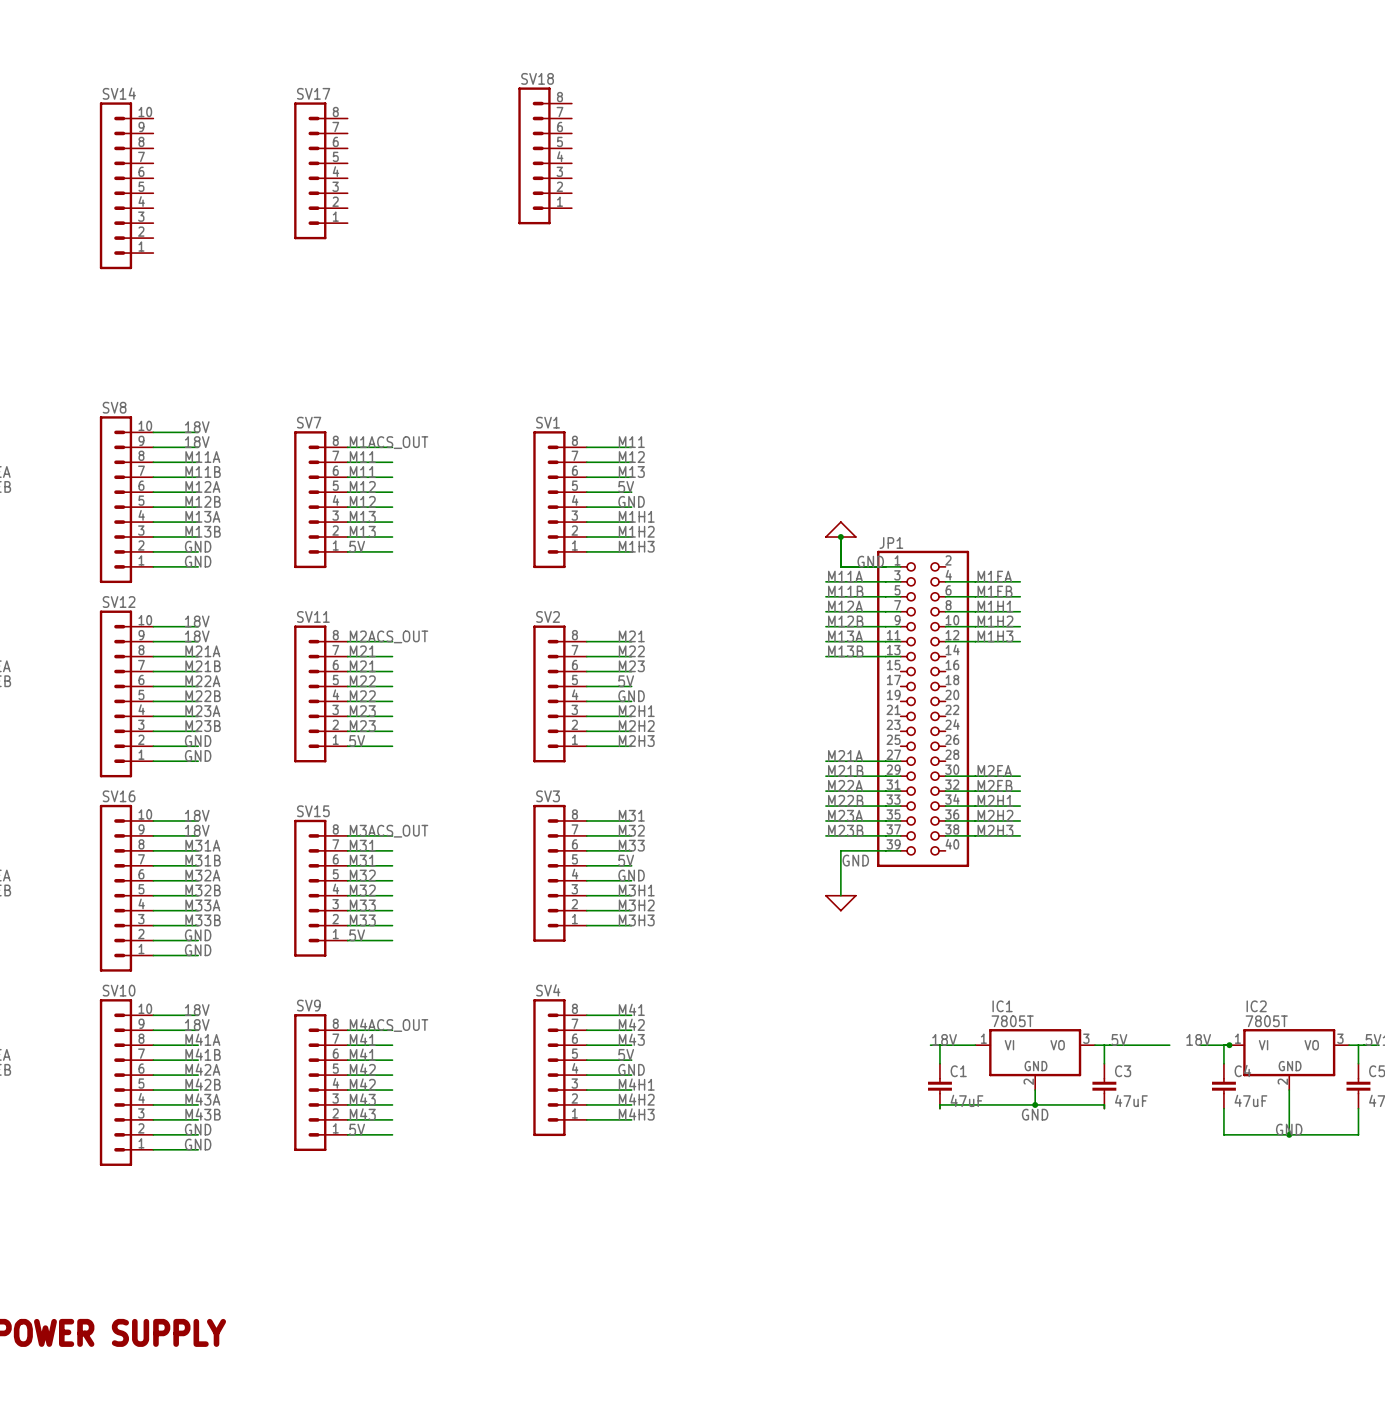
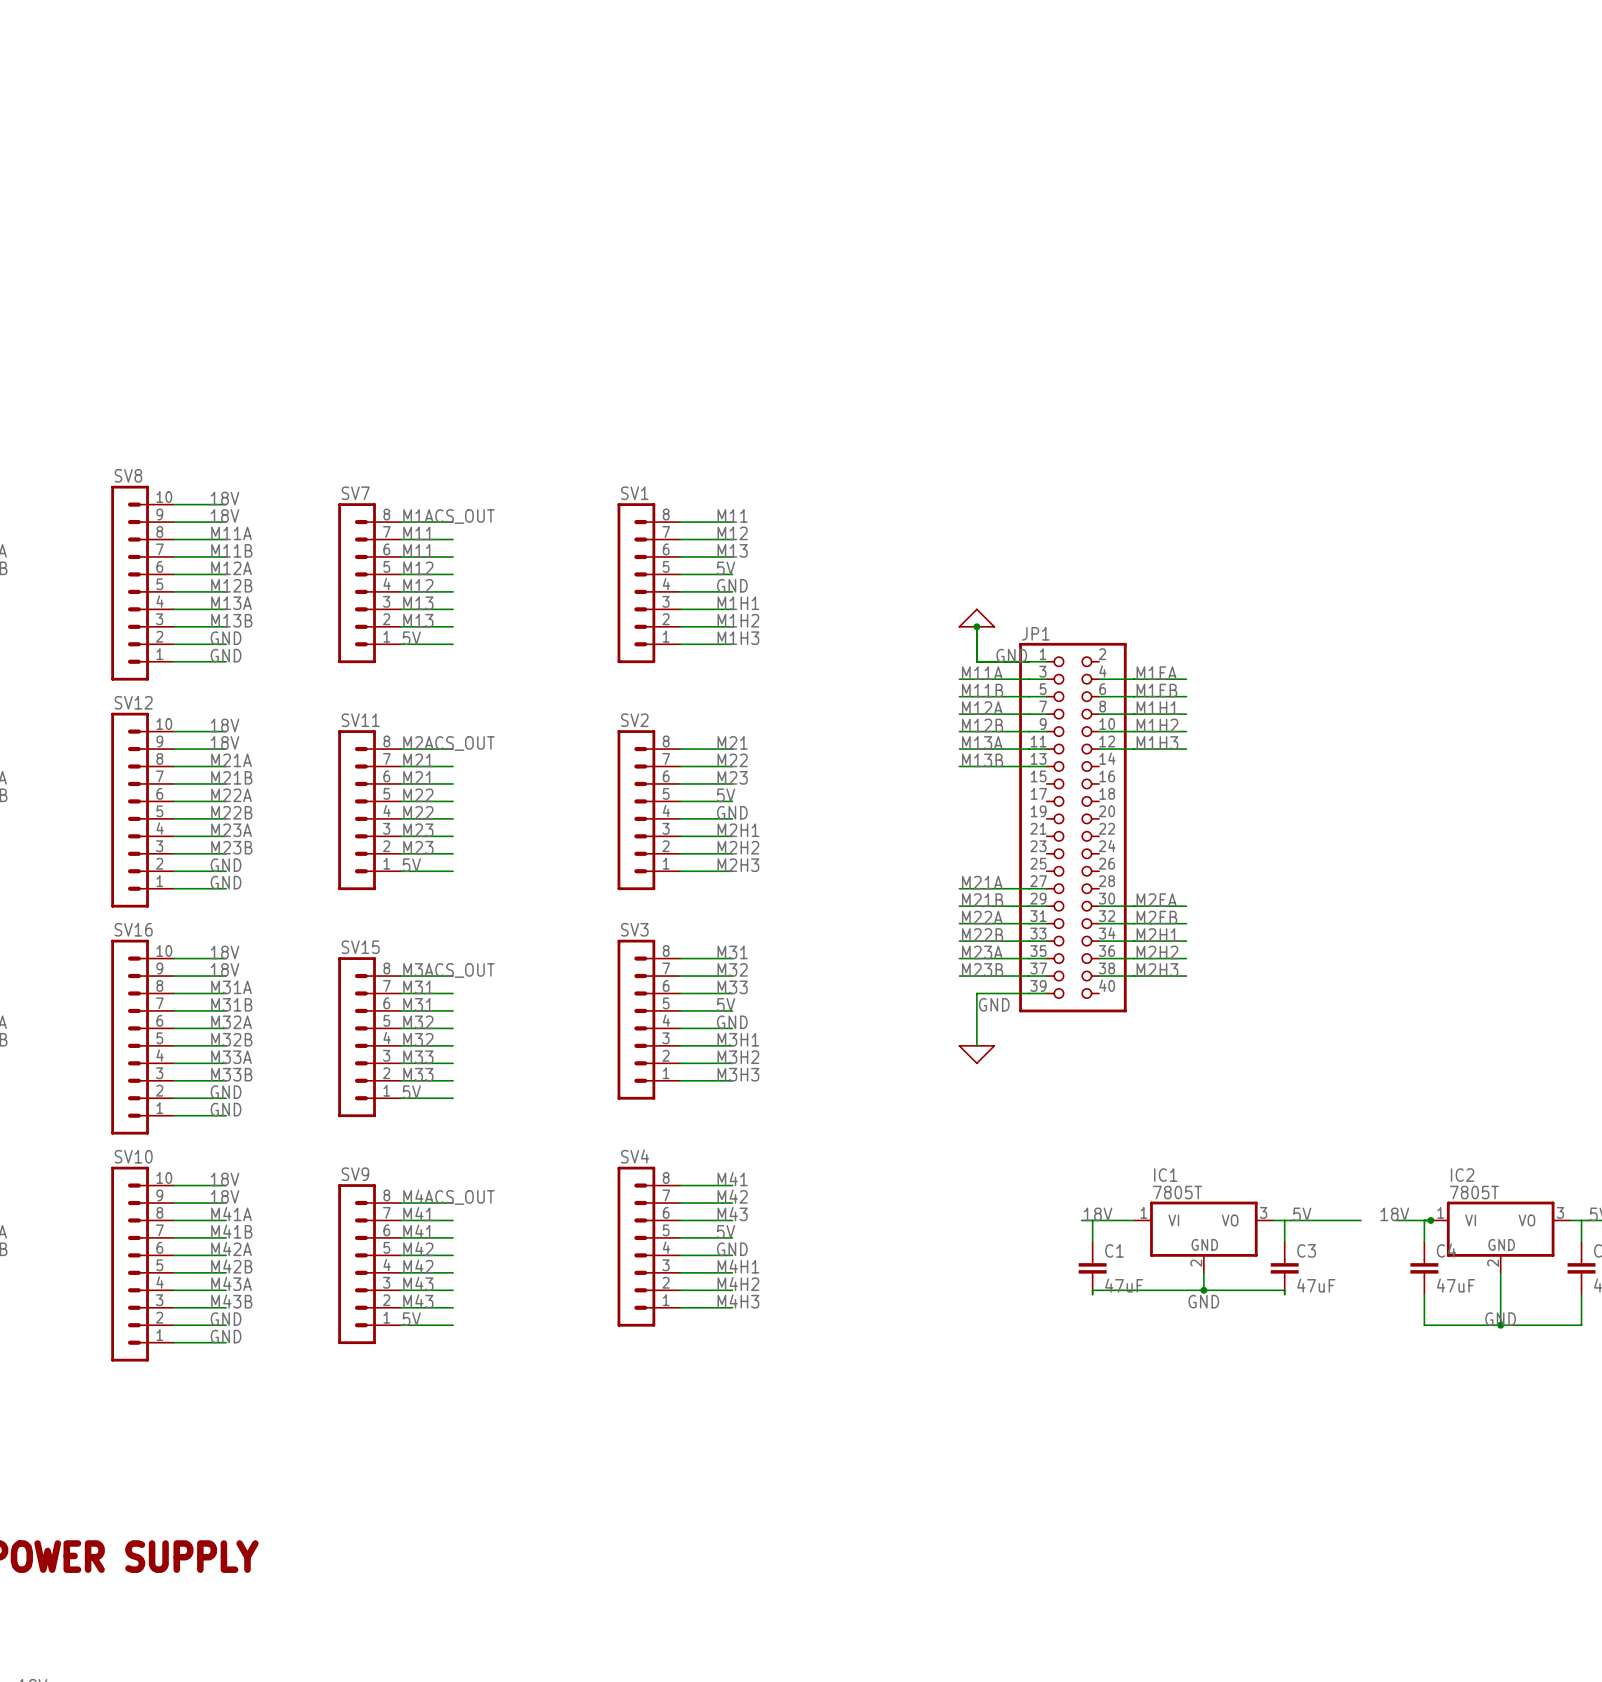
SV18: (545, 155) -> none
SV17: (320, 170) -> none
SV14: (126, 185) -> none

